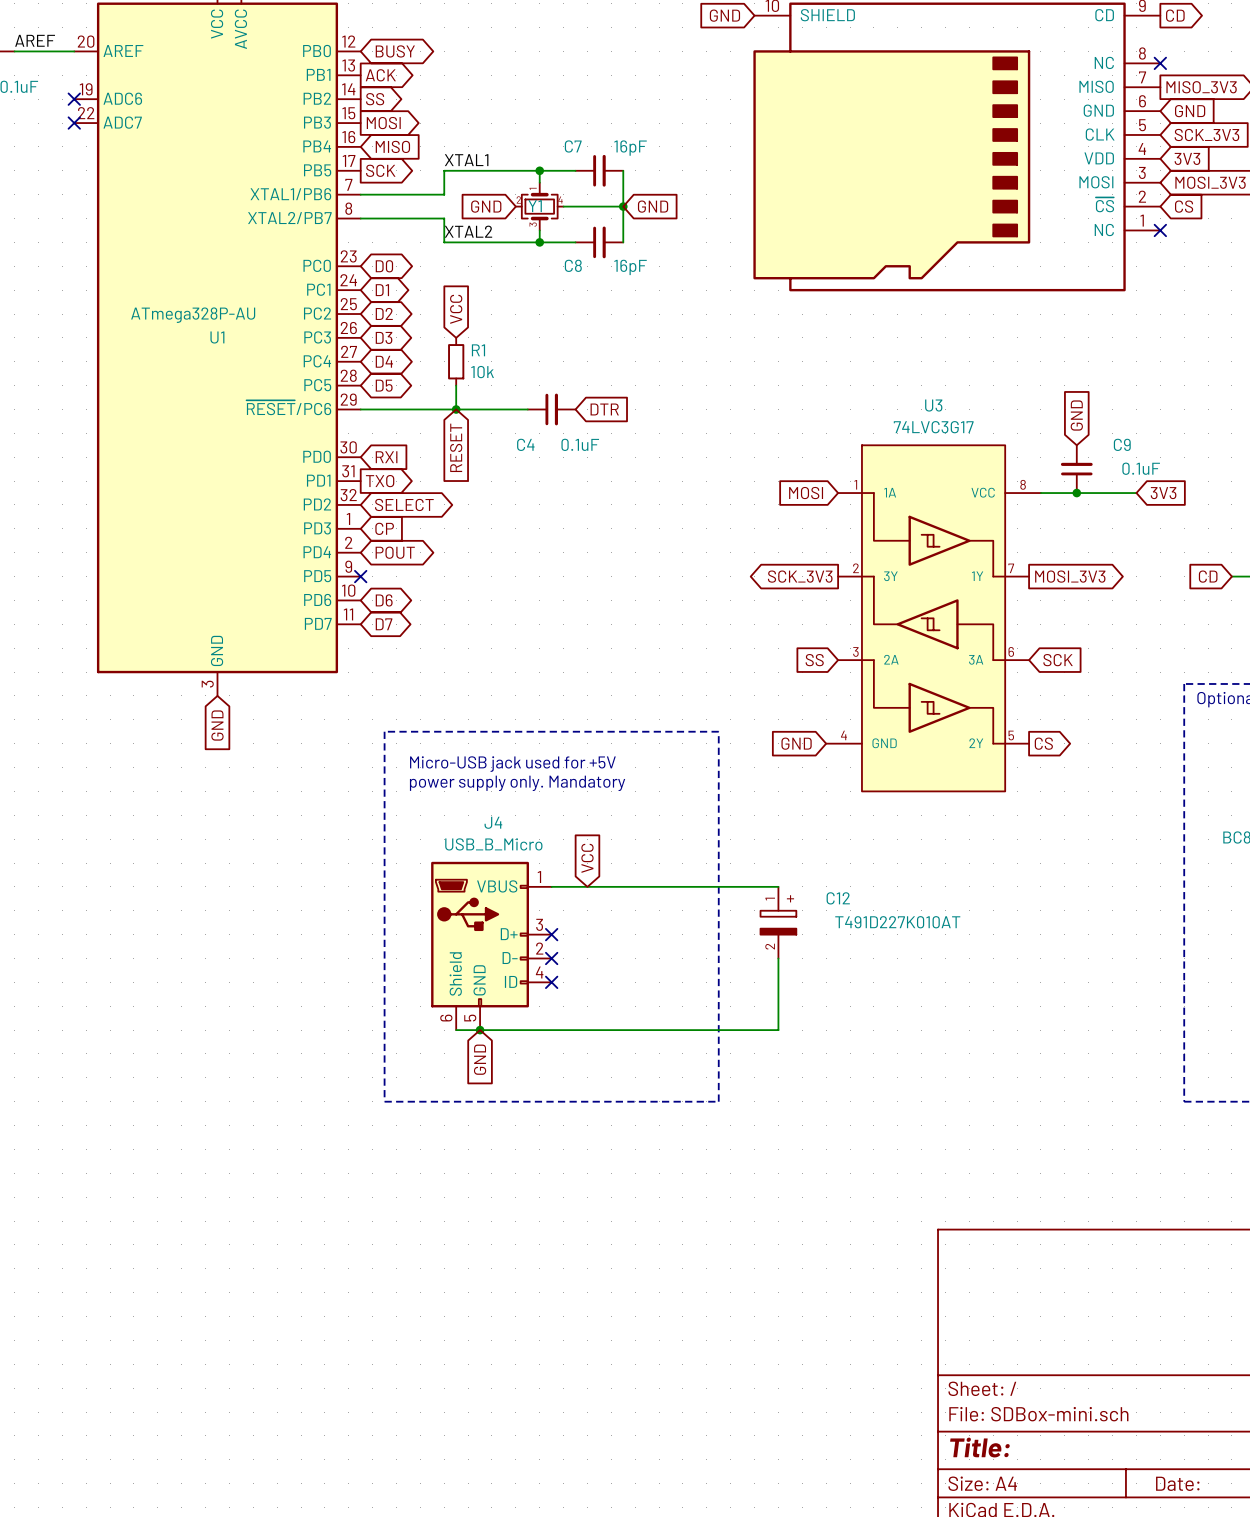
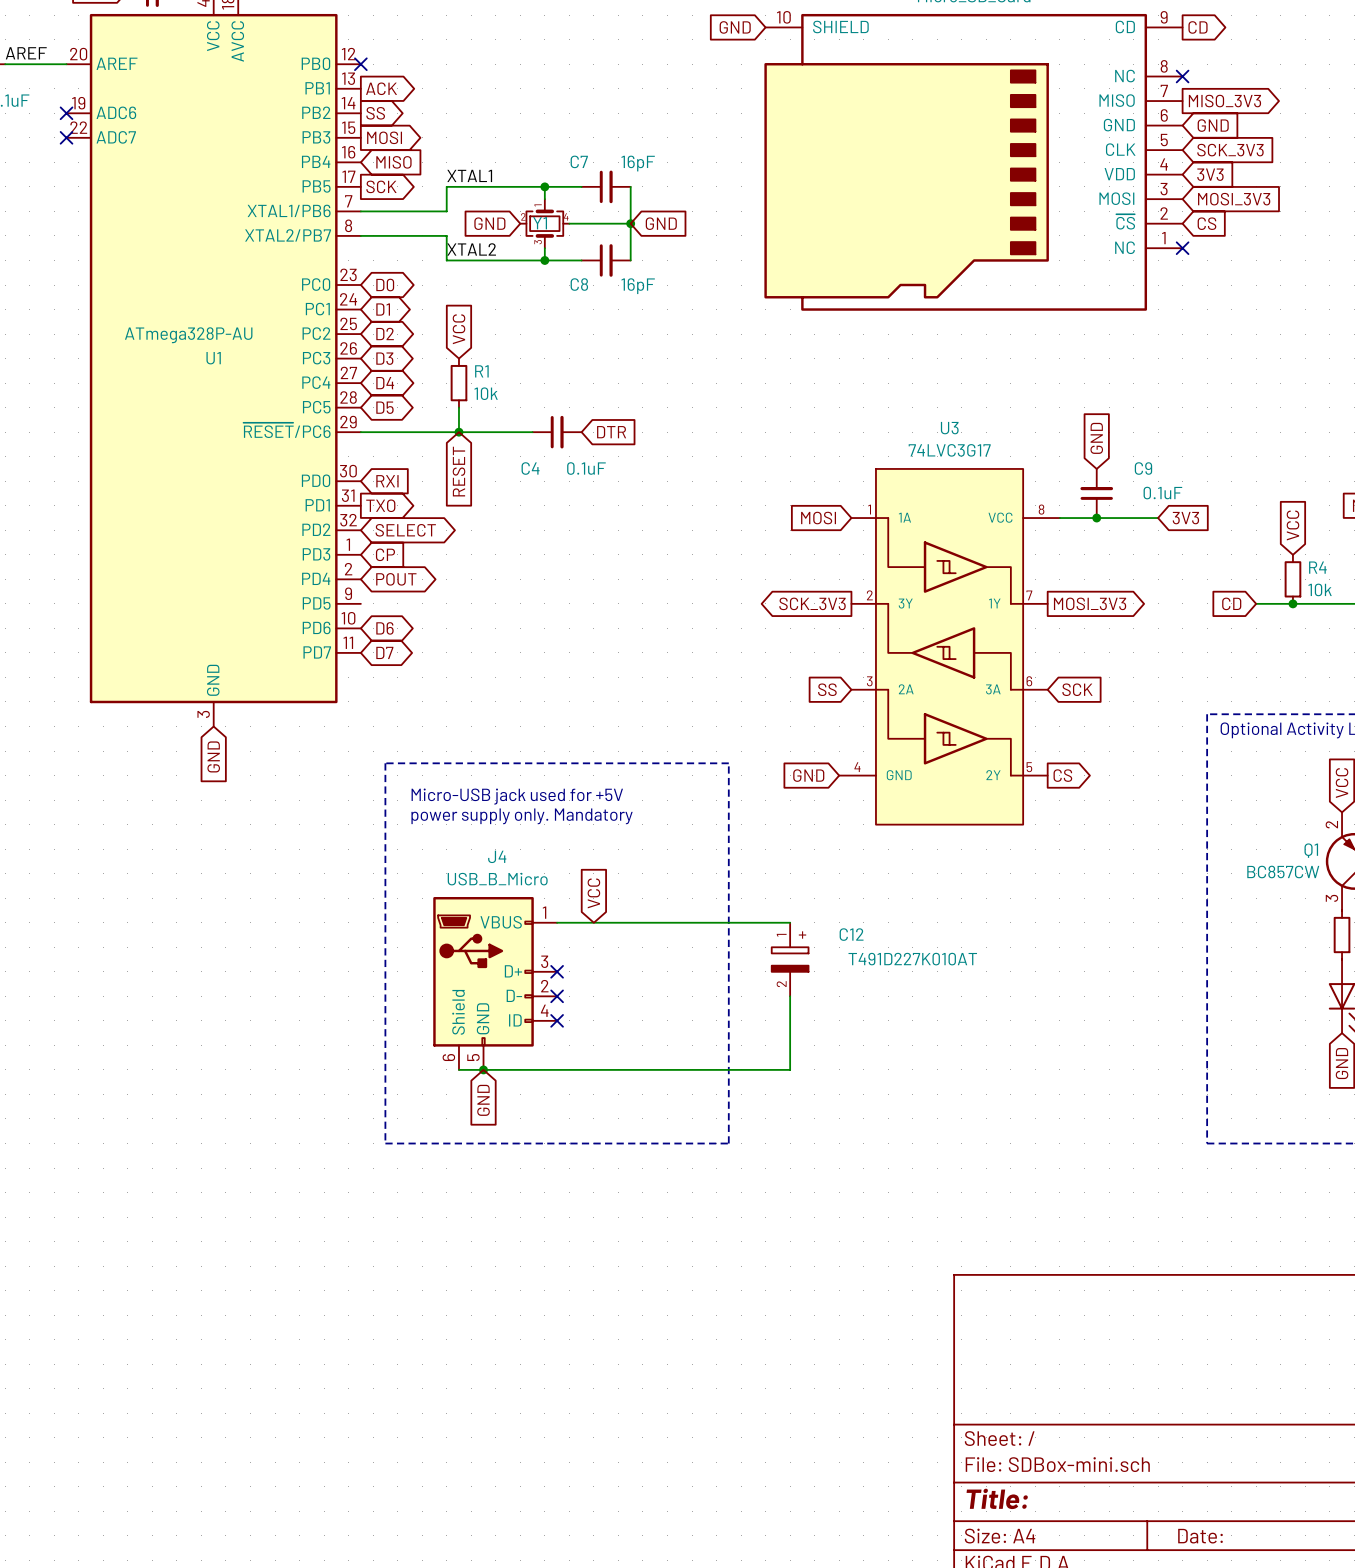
no-connect mark: none -> (360, 64)
global label: BUSY (395, 51) -> none
no-connect mark: (360, 576) -> none

